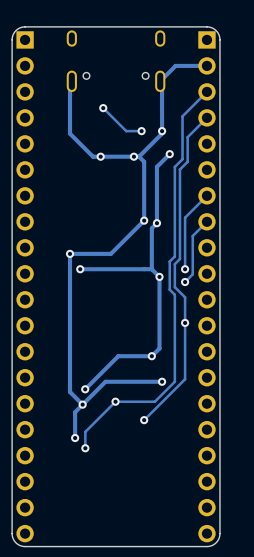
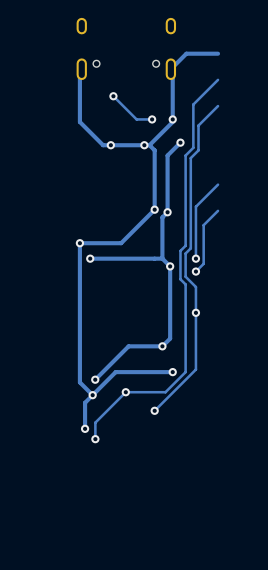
board edge: (206, 26) (25, 26) (18, 28) (12, 35) (12, 533) (14, 541) (20, 545) (206, 546) (215, 543) (219, 537) (219, 39) (216, 30) (206, 26) -> none
part: (25, 286) -> none
part: (206, 286) -> none

